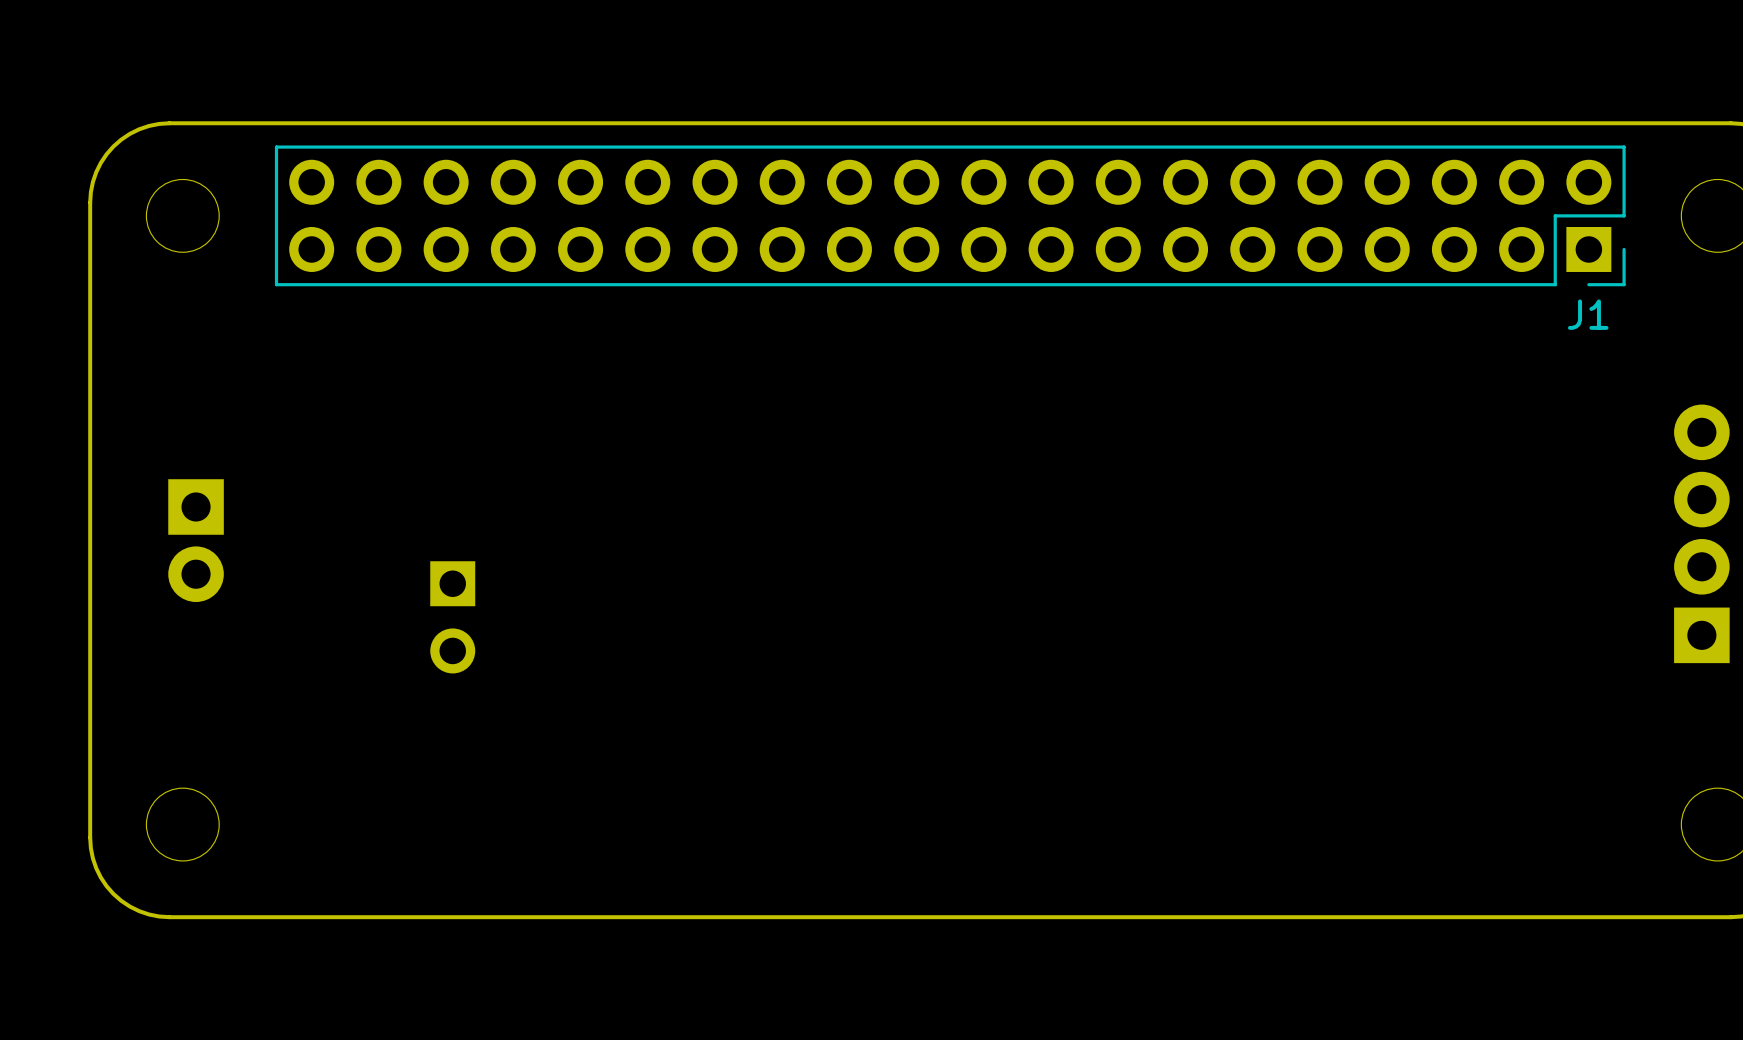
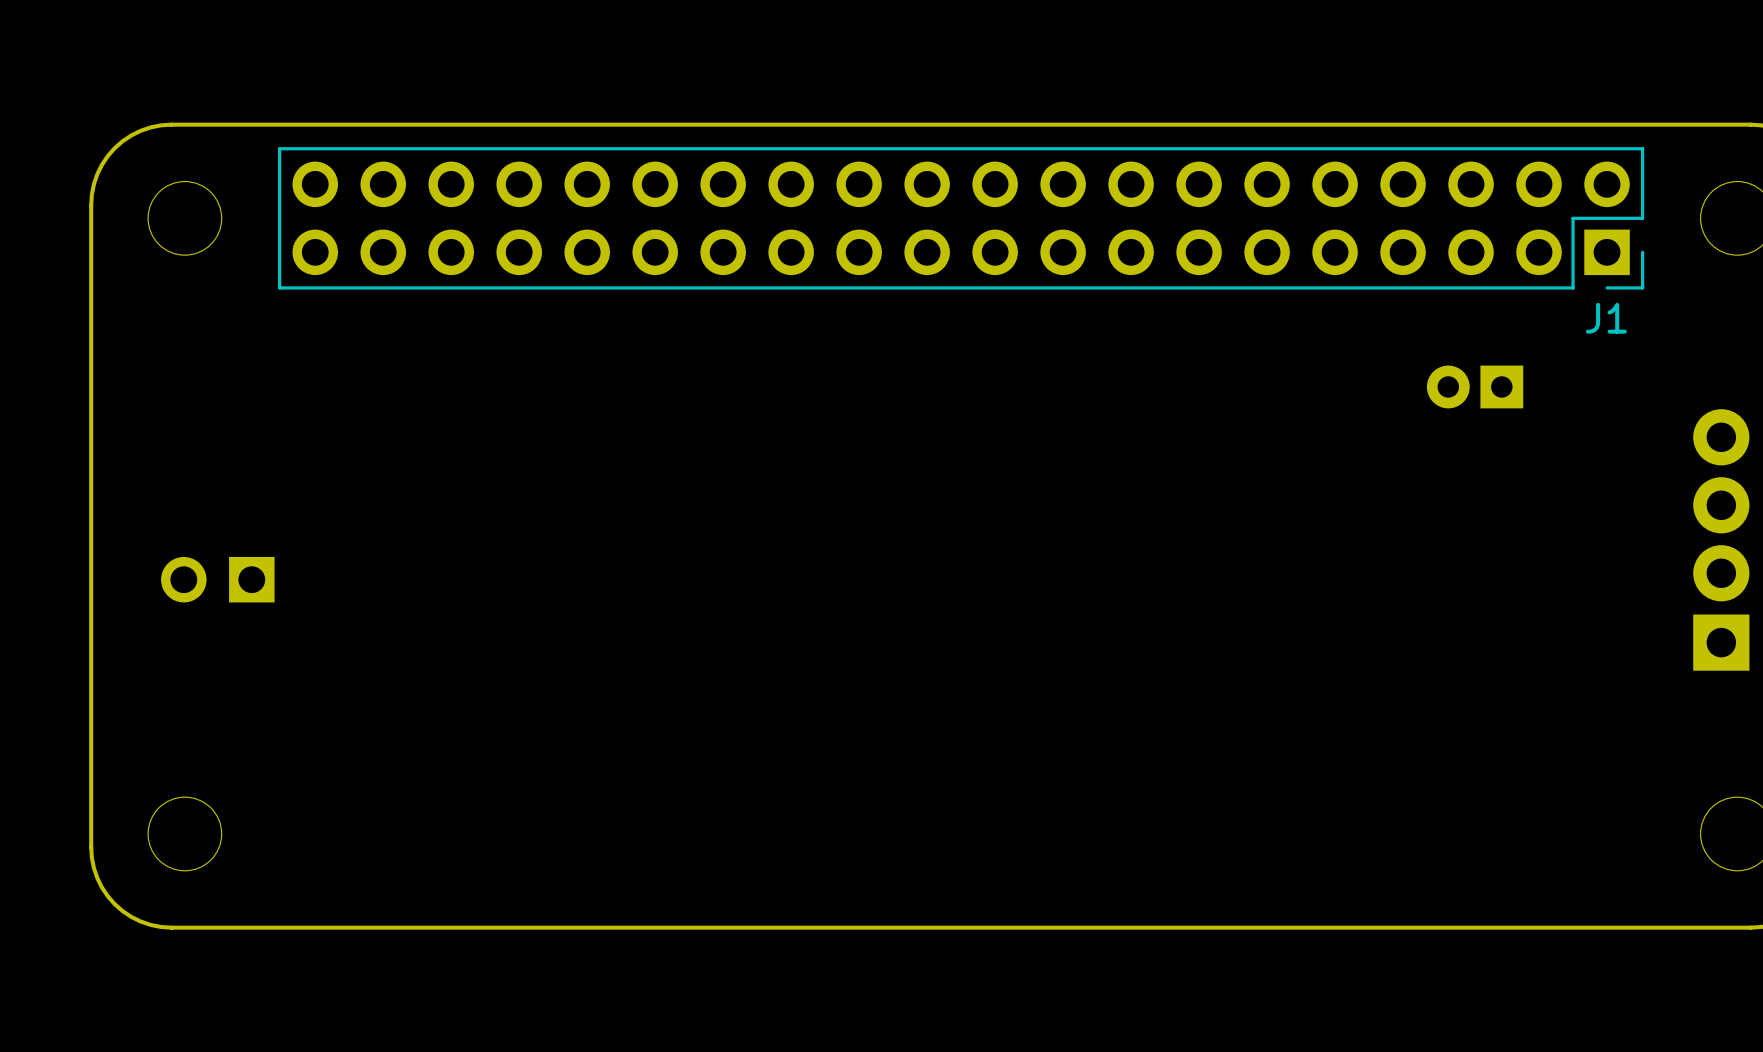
part: none -> (1475, 386)
part: (196, 540) -> none
part rotation: 0° (452, 617) -> 90° clockwise (217, 579)
part position: (452, 617) -> (217, 579)

